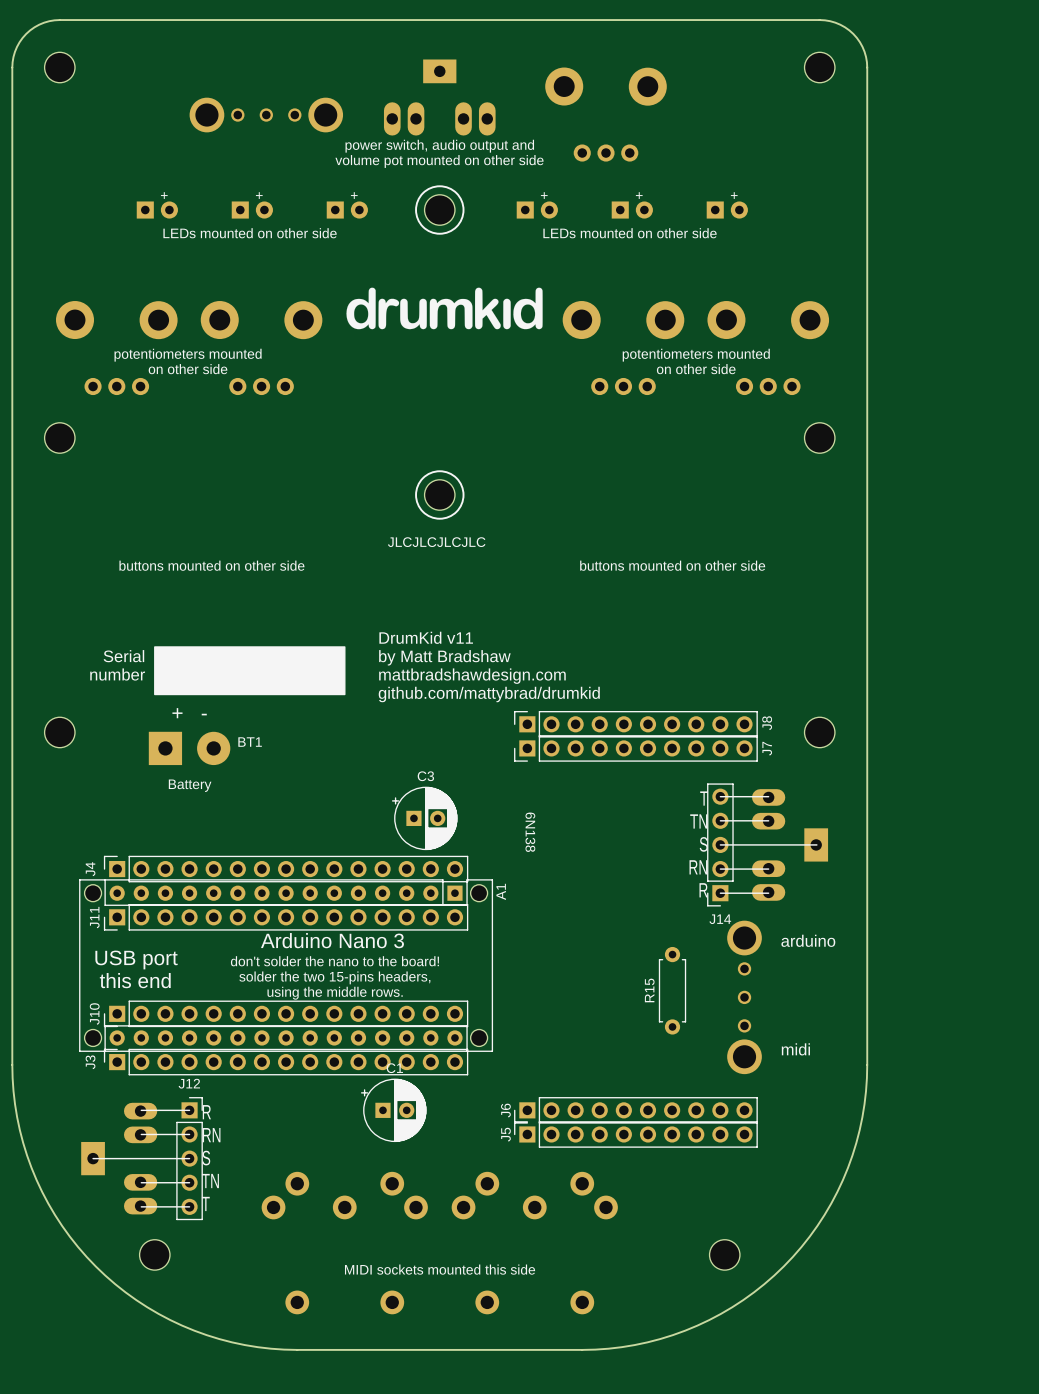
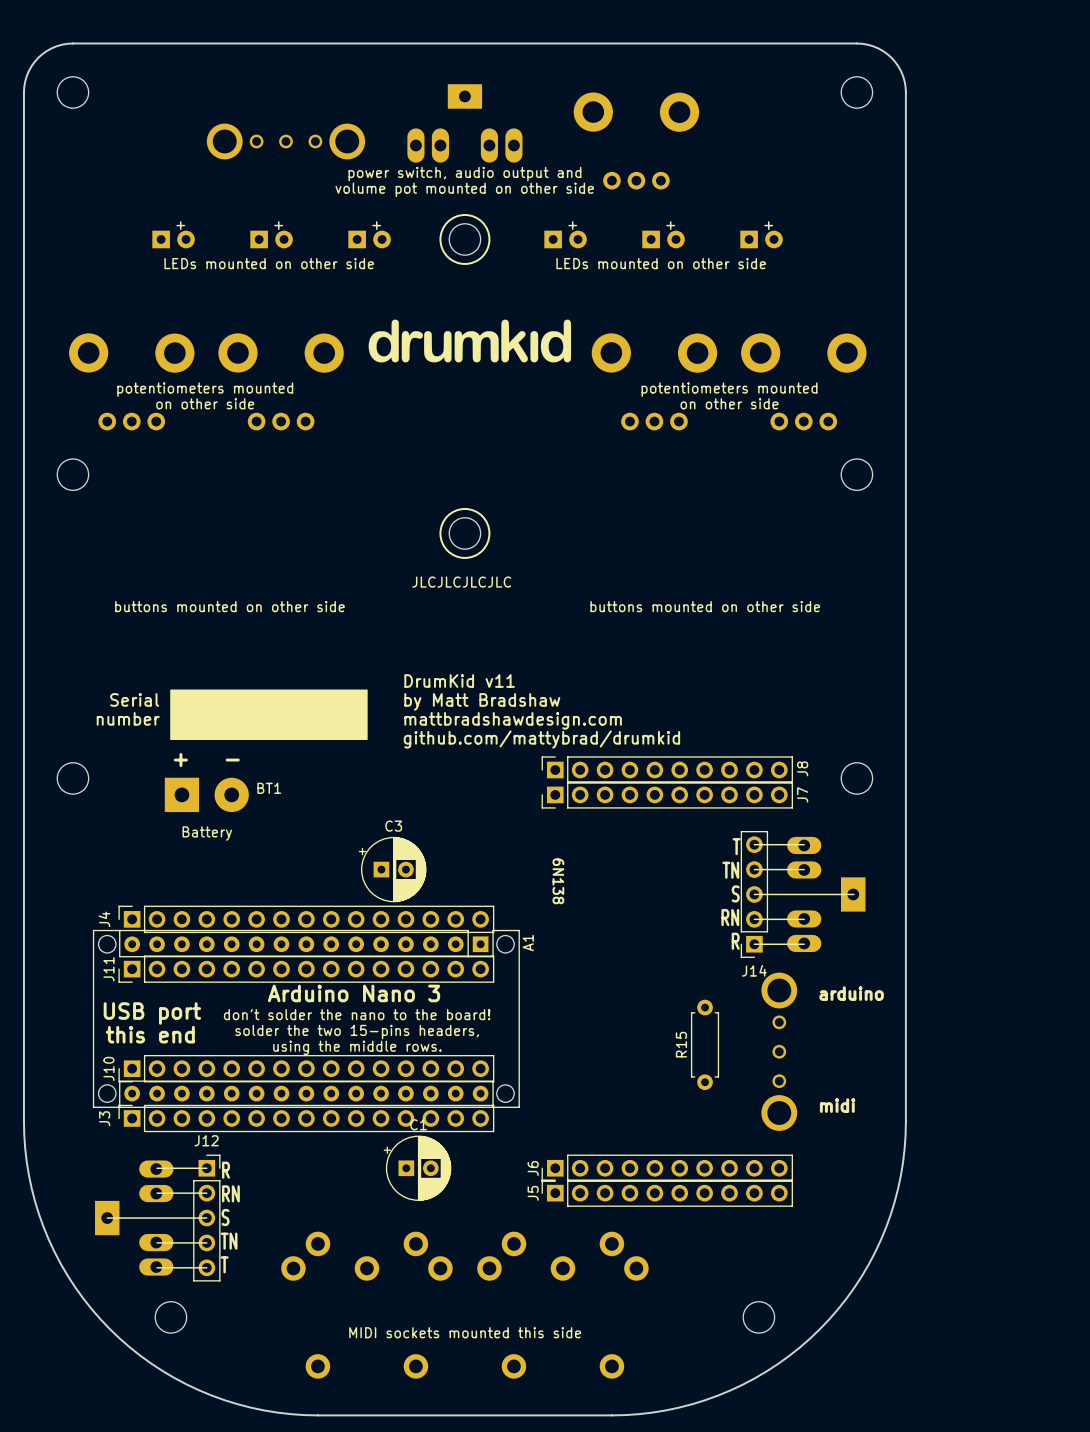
C3 position: (424, 818) -> (392, 869)

